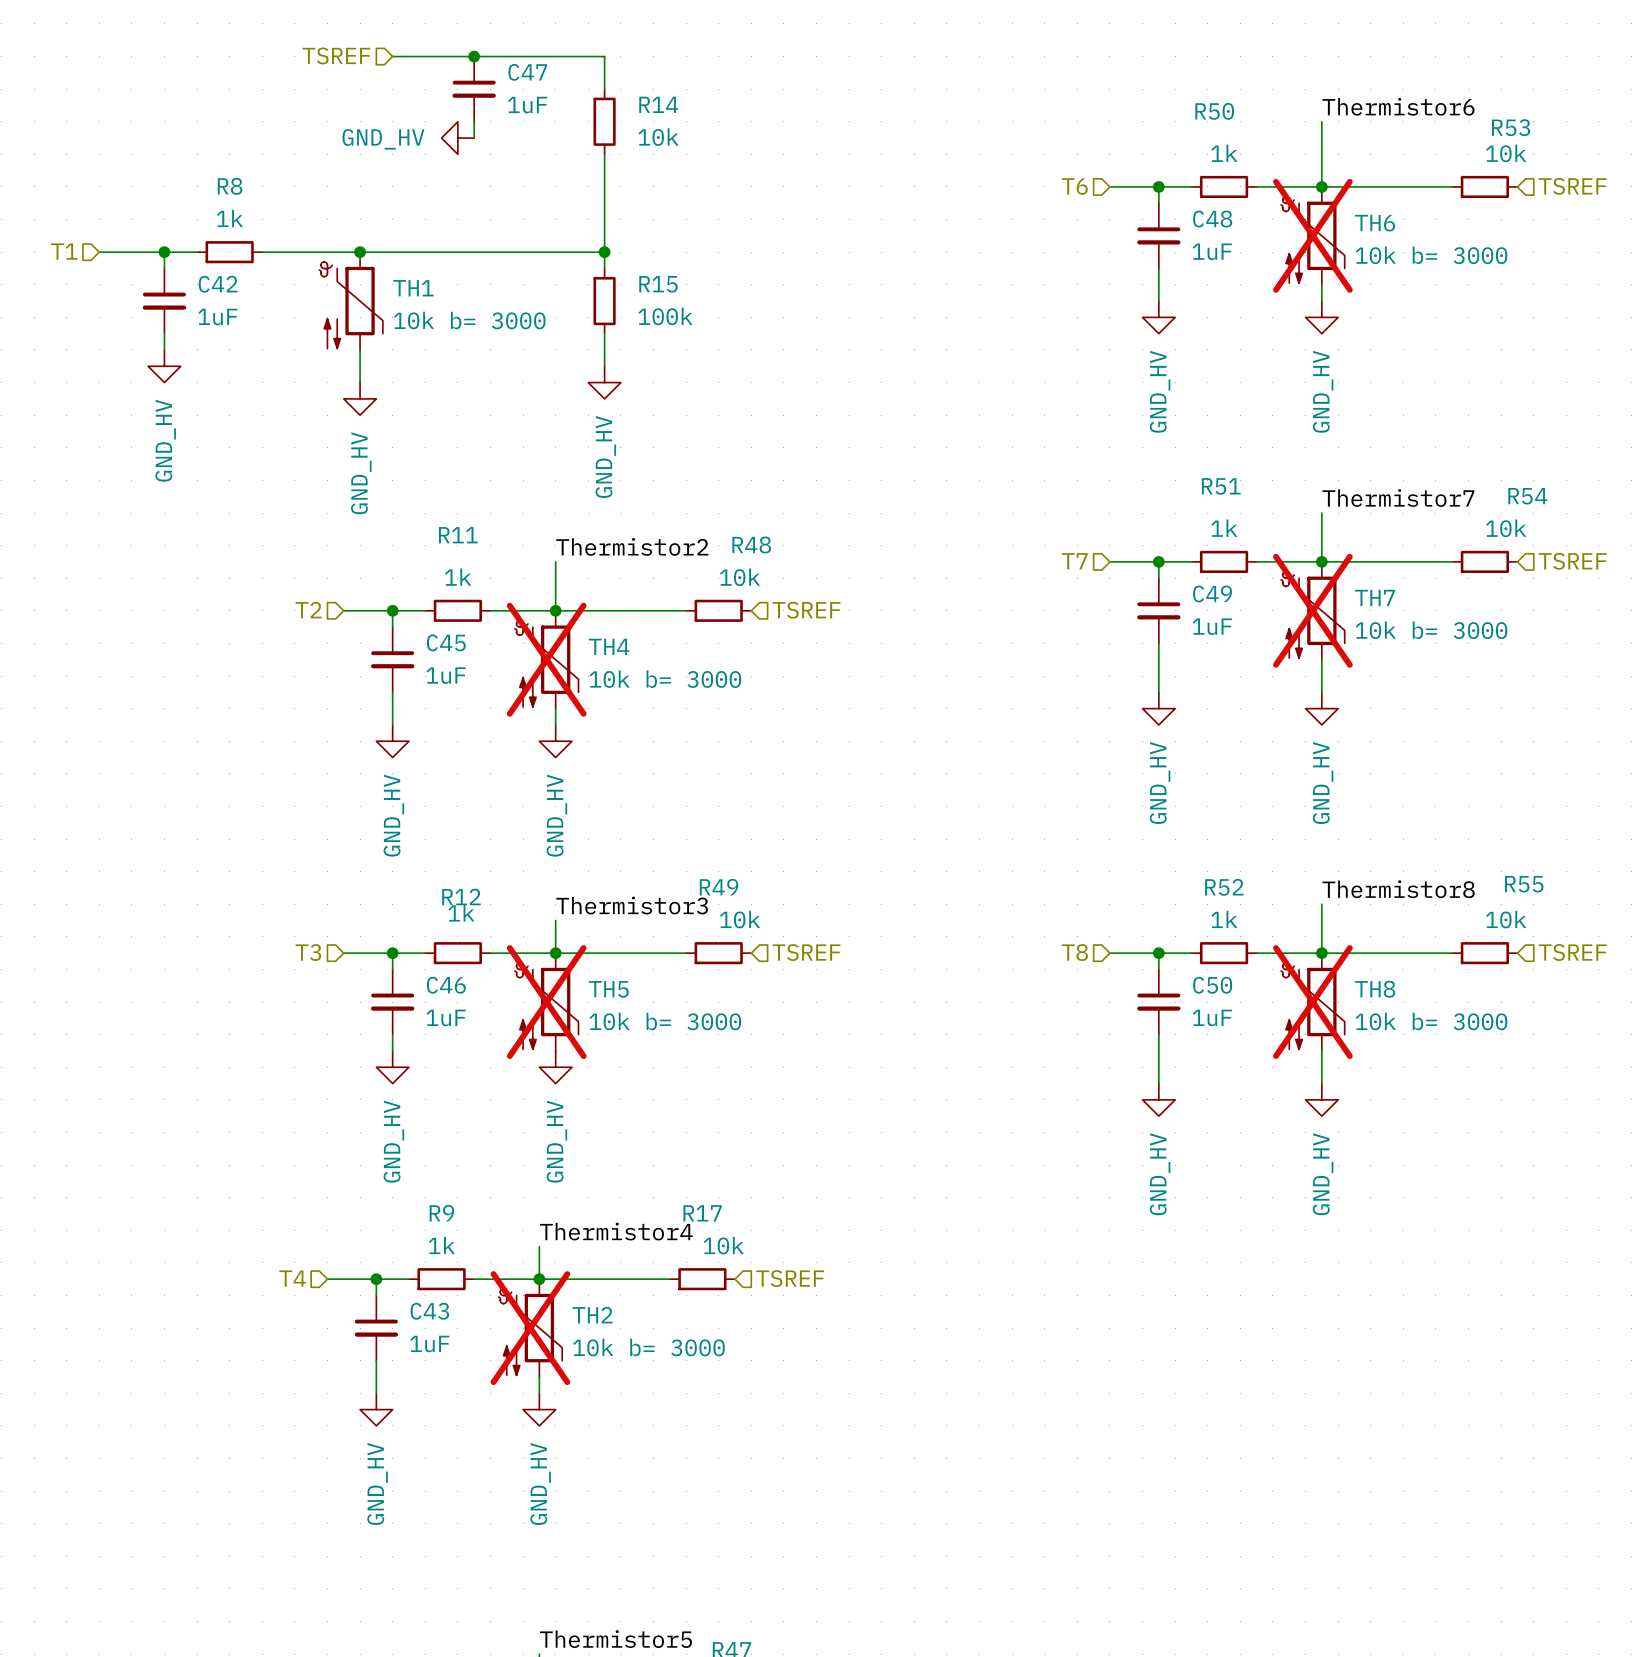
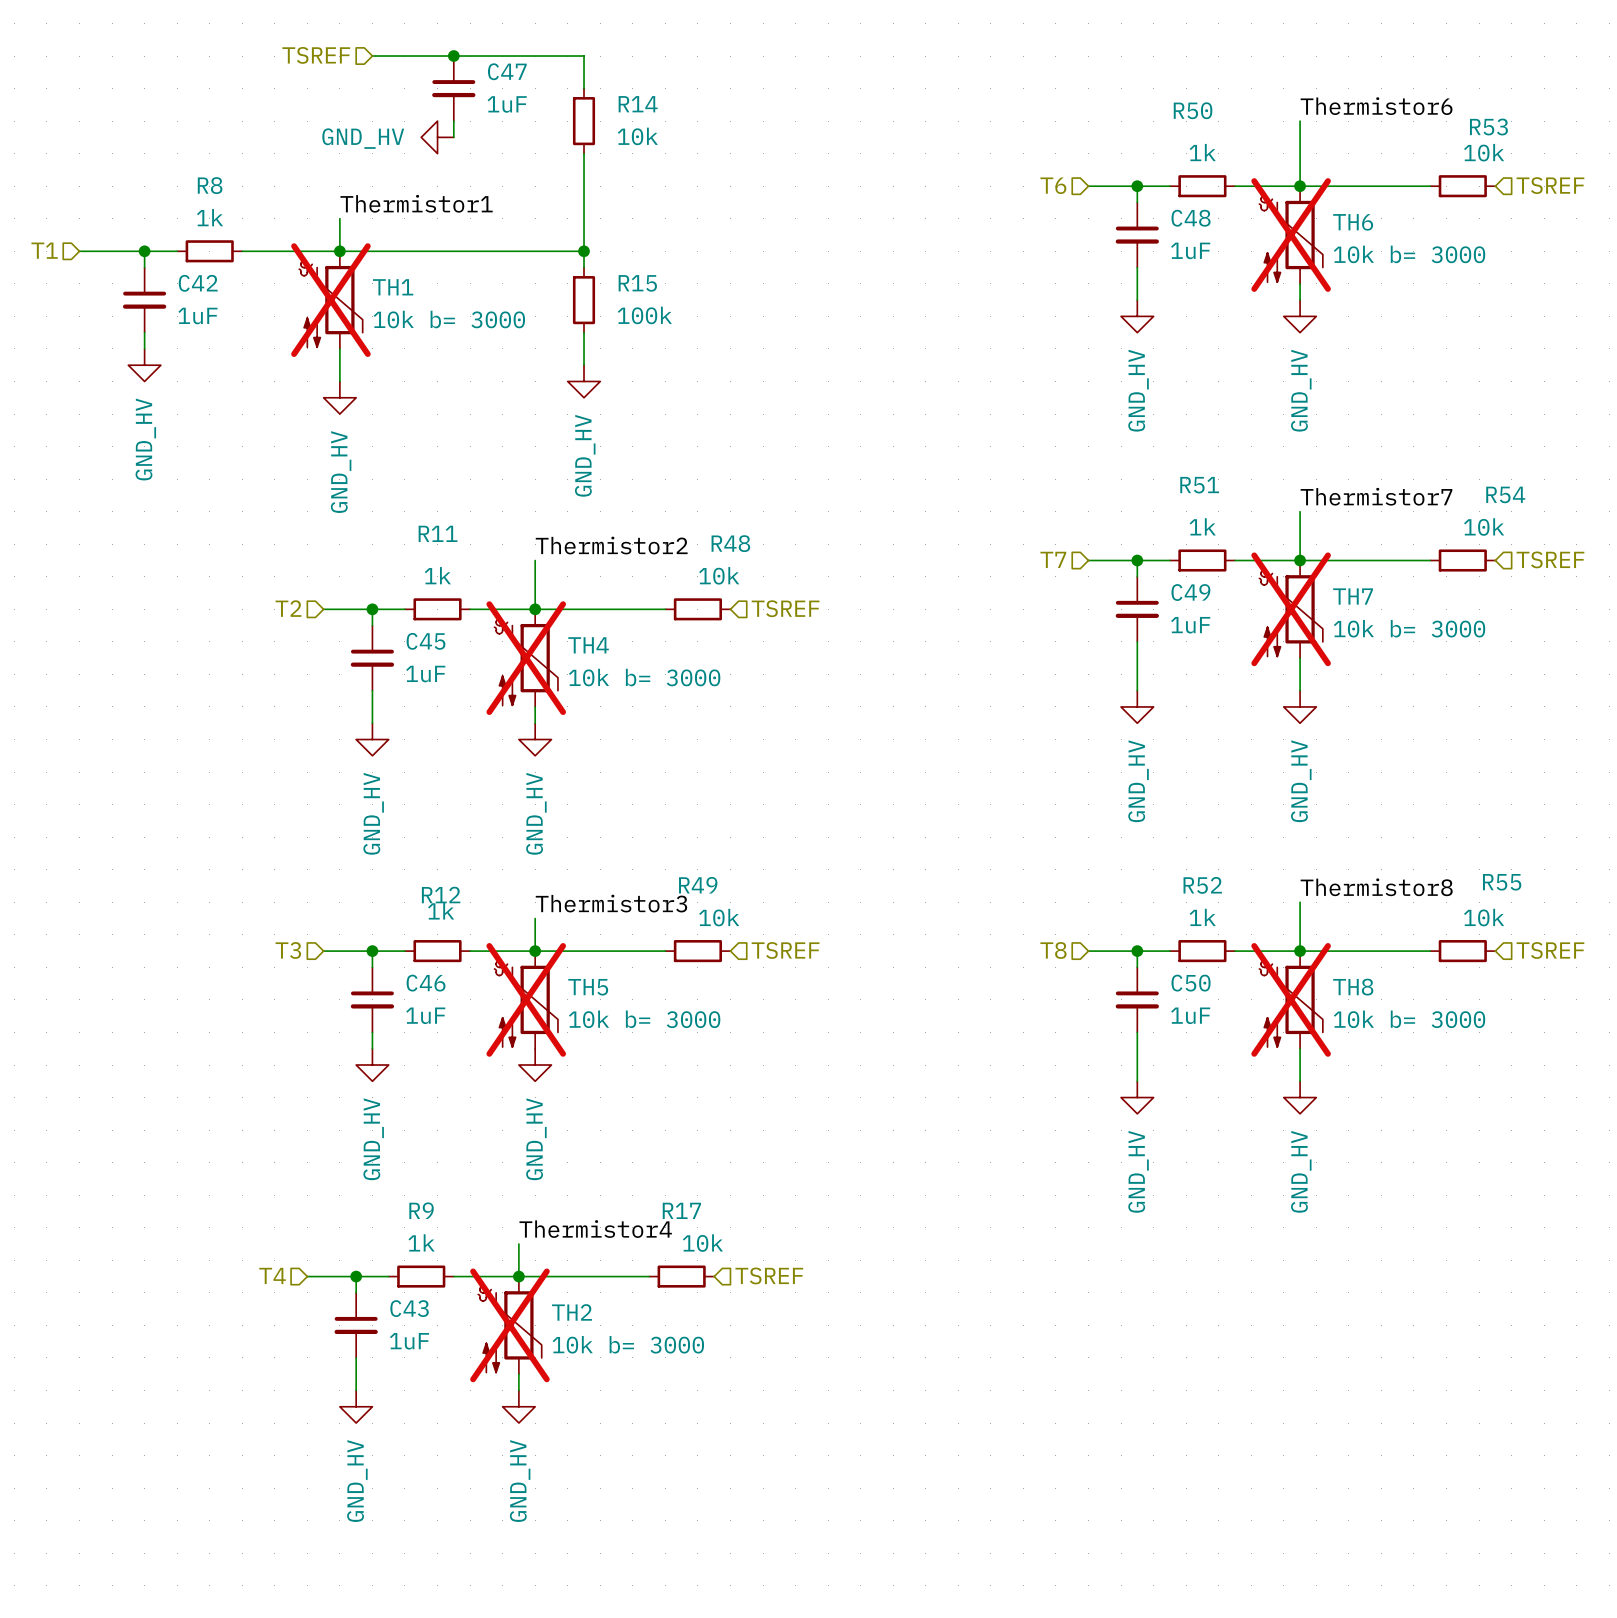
label: none -> Thermistor1 (416, 203)
wire: none -> (339, 218) (339, 251)
TH1 do-not-place cross: none -> (330, 300)

